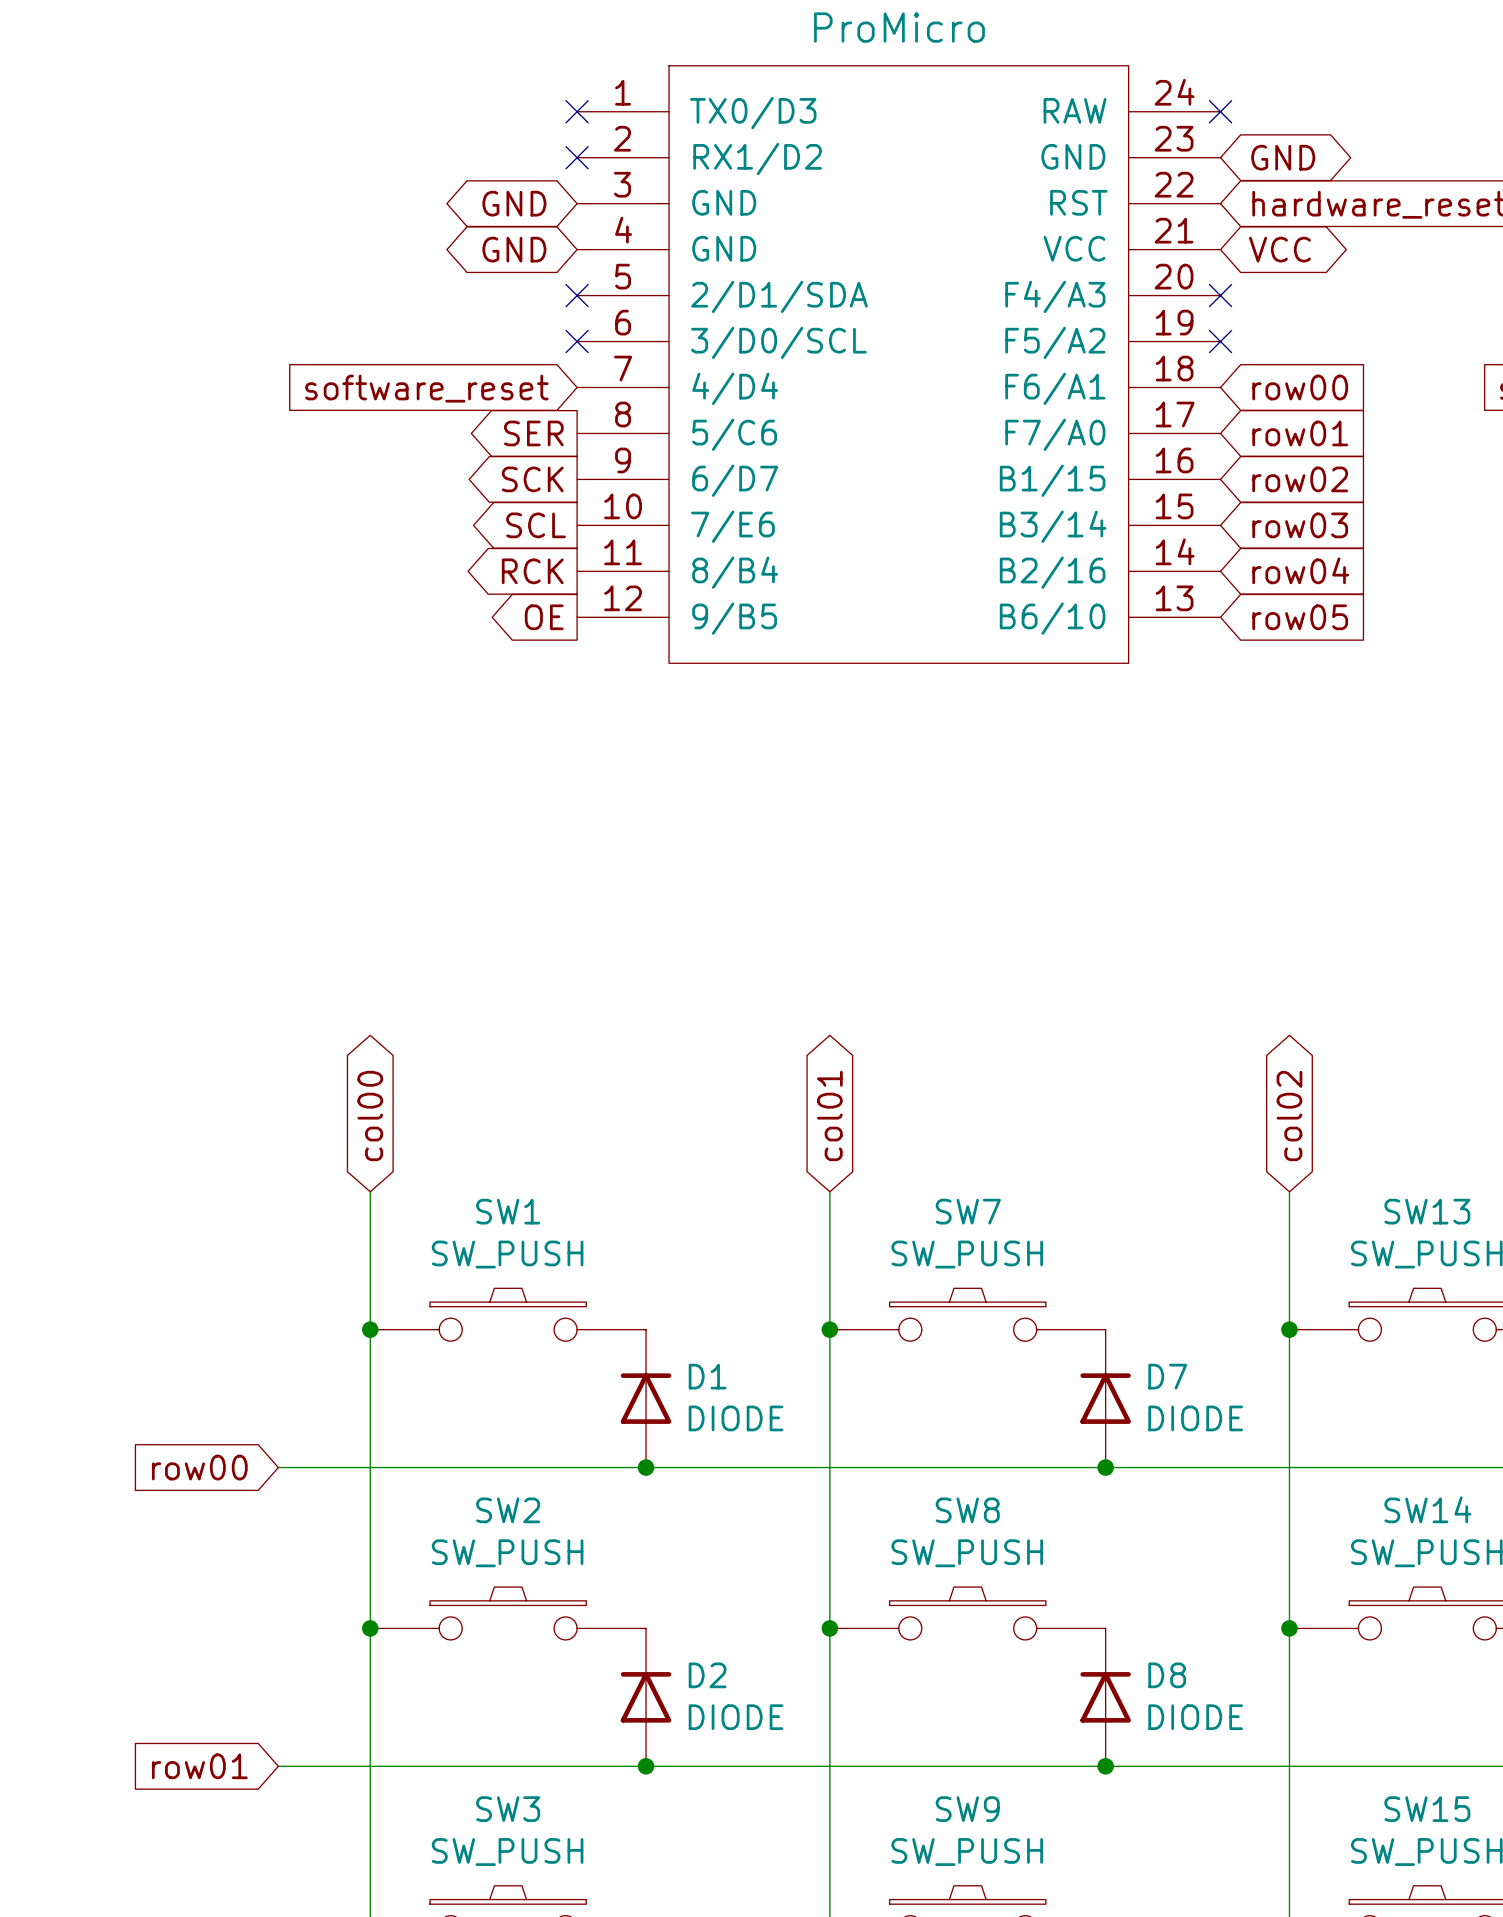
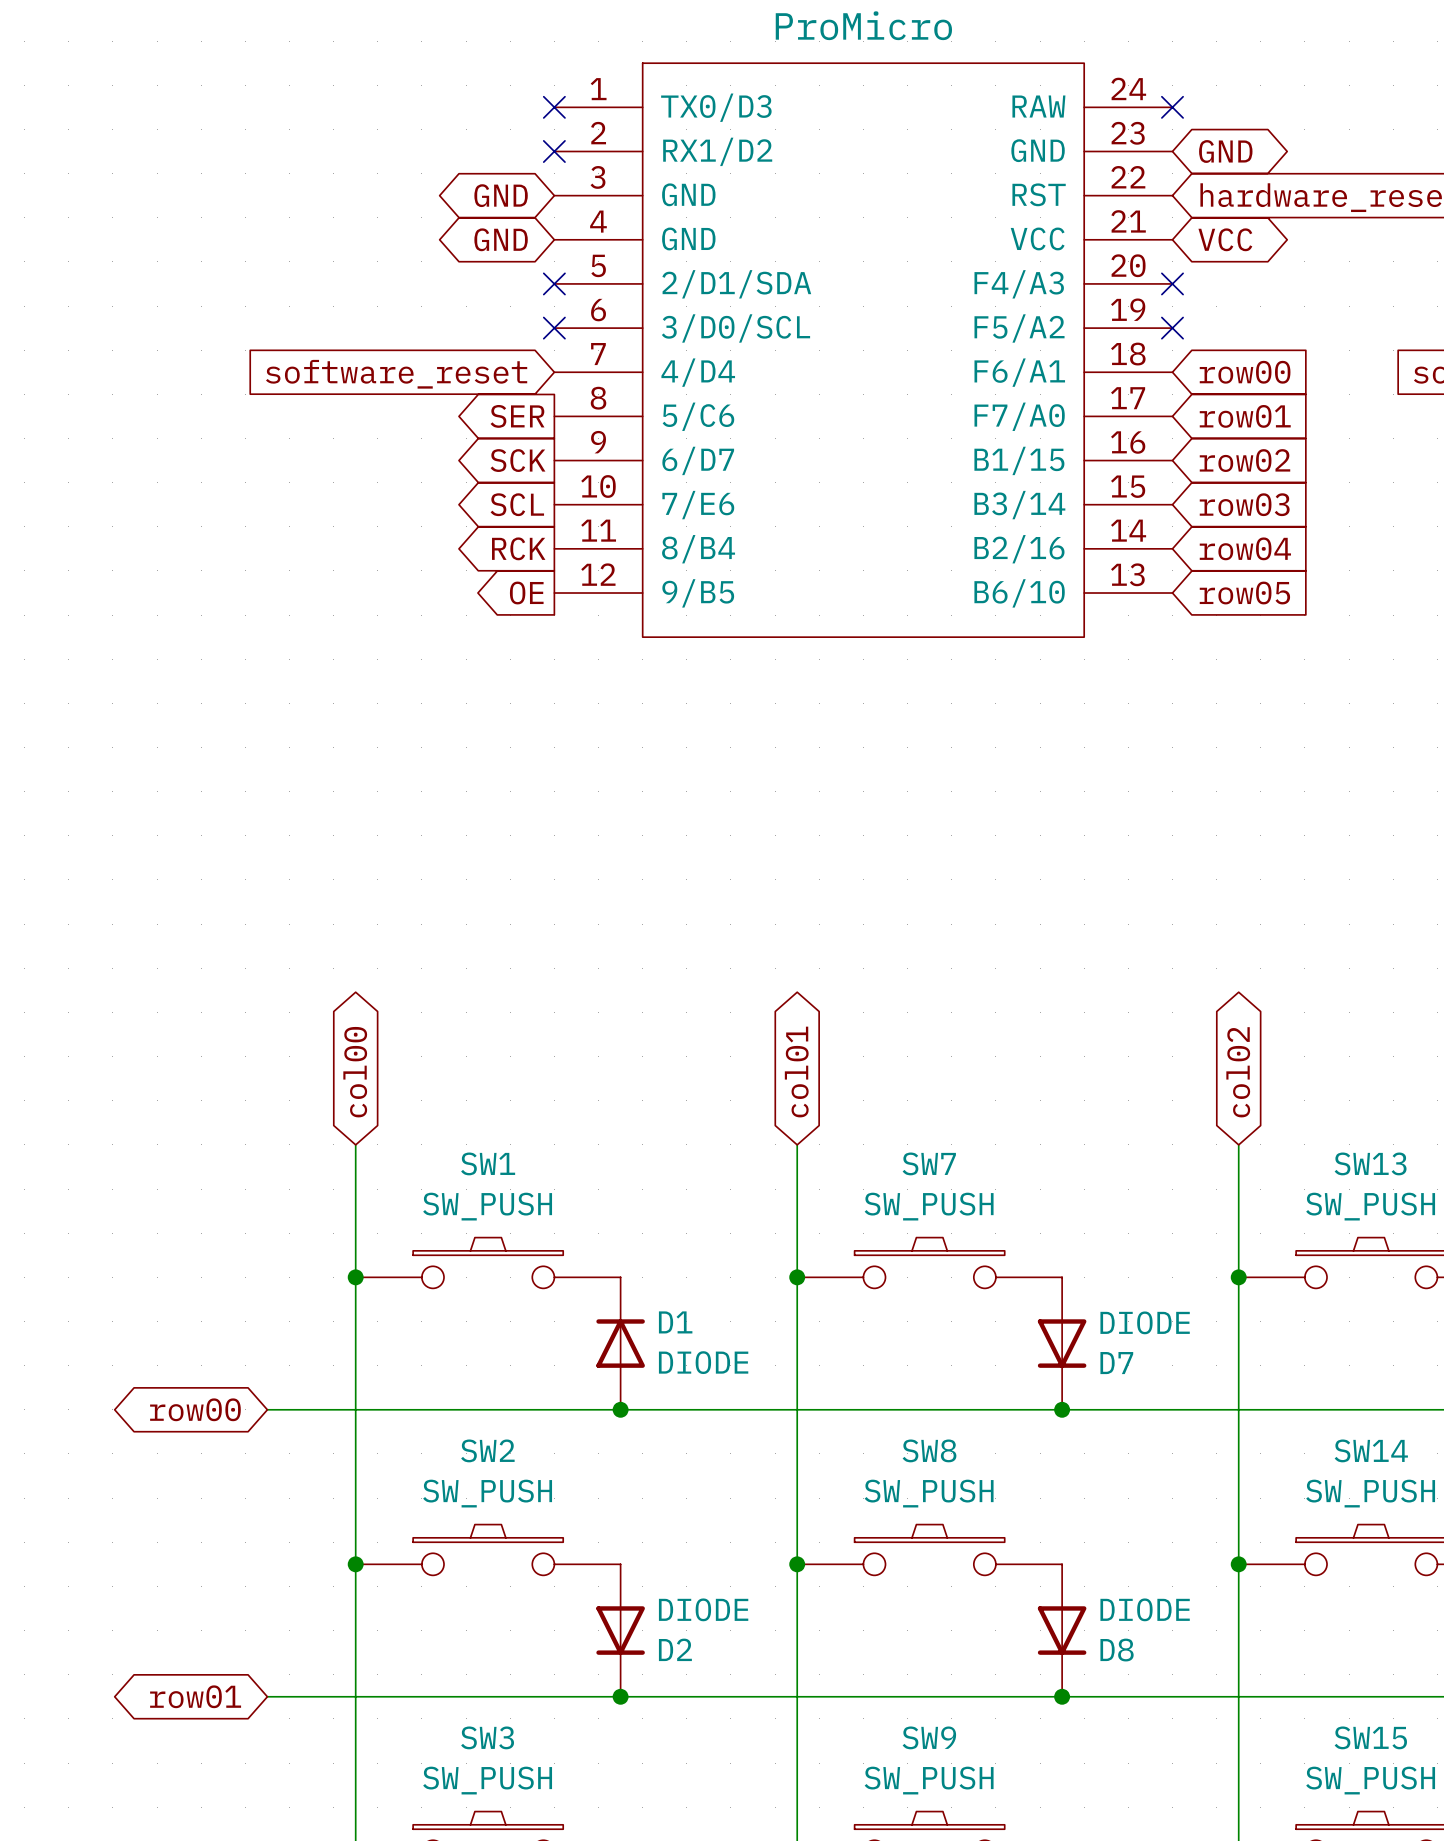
D7 name position: D7 (1167, 1376) -> D7 (1116, 1363)
D7 rotation: 0° (1105, 1398) -> 180° (1062, 1343)
D7 value position: DIODE (1195, 1418) -> DIODE (1145, 1322)
global label shape: input (199, 1467) -> bidirectional (195, 1409)
D2 name position: D2 (707, 1675) -> D2 (675, 1649)
D8 name position: D8 (1167, 1675) -> D8 (1117, 1650)
D2 rotation: 0° (646, 1697) -> 180° (620, 1630)
D8 rotation: 0° (1105, 1697) -> 180° (1062, 1630)
D2 value position: DIODE (736, 1717) -> DIODE (703, 1609)
D8 value position: DIODE (1195, 1717) -> DIODE (1145, 1609)
global label shape: input (199, 1766) -> bidirectional (195, 1696)

